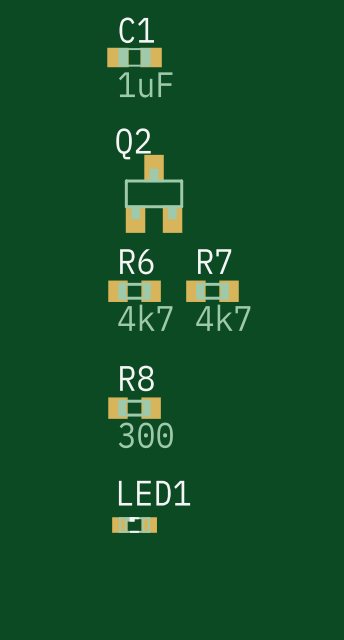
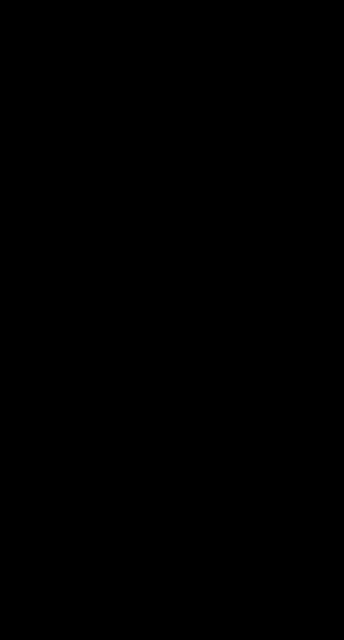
C1: 1uF (134, 57) -> none
Q2: (154, 193) -> none
R6: 4k7 (134, 291) -> none
R7: 4k7 (212, 291) -> none
R8: 300 (134, 408) -> none
LED1: (134, 525) -> none

